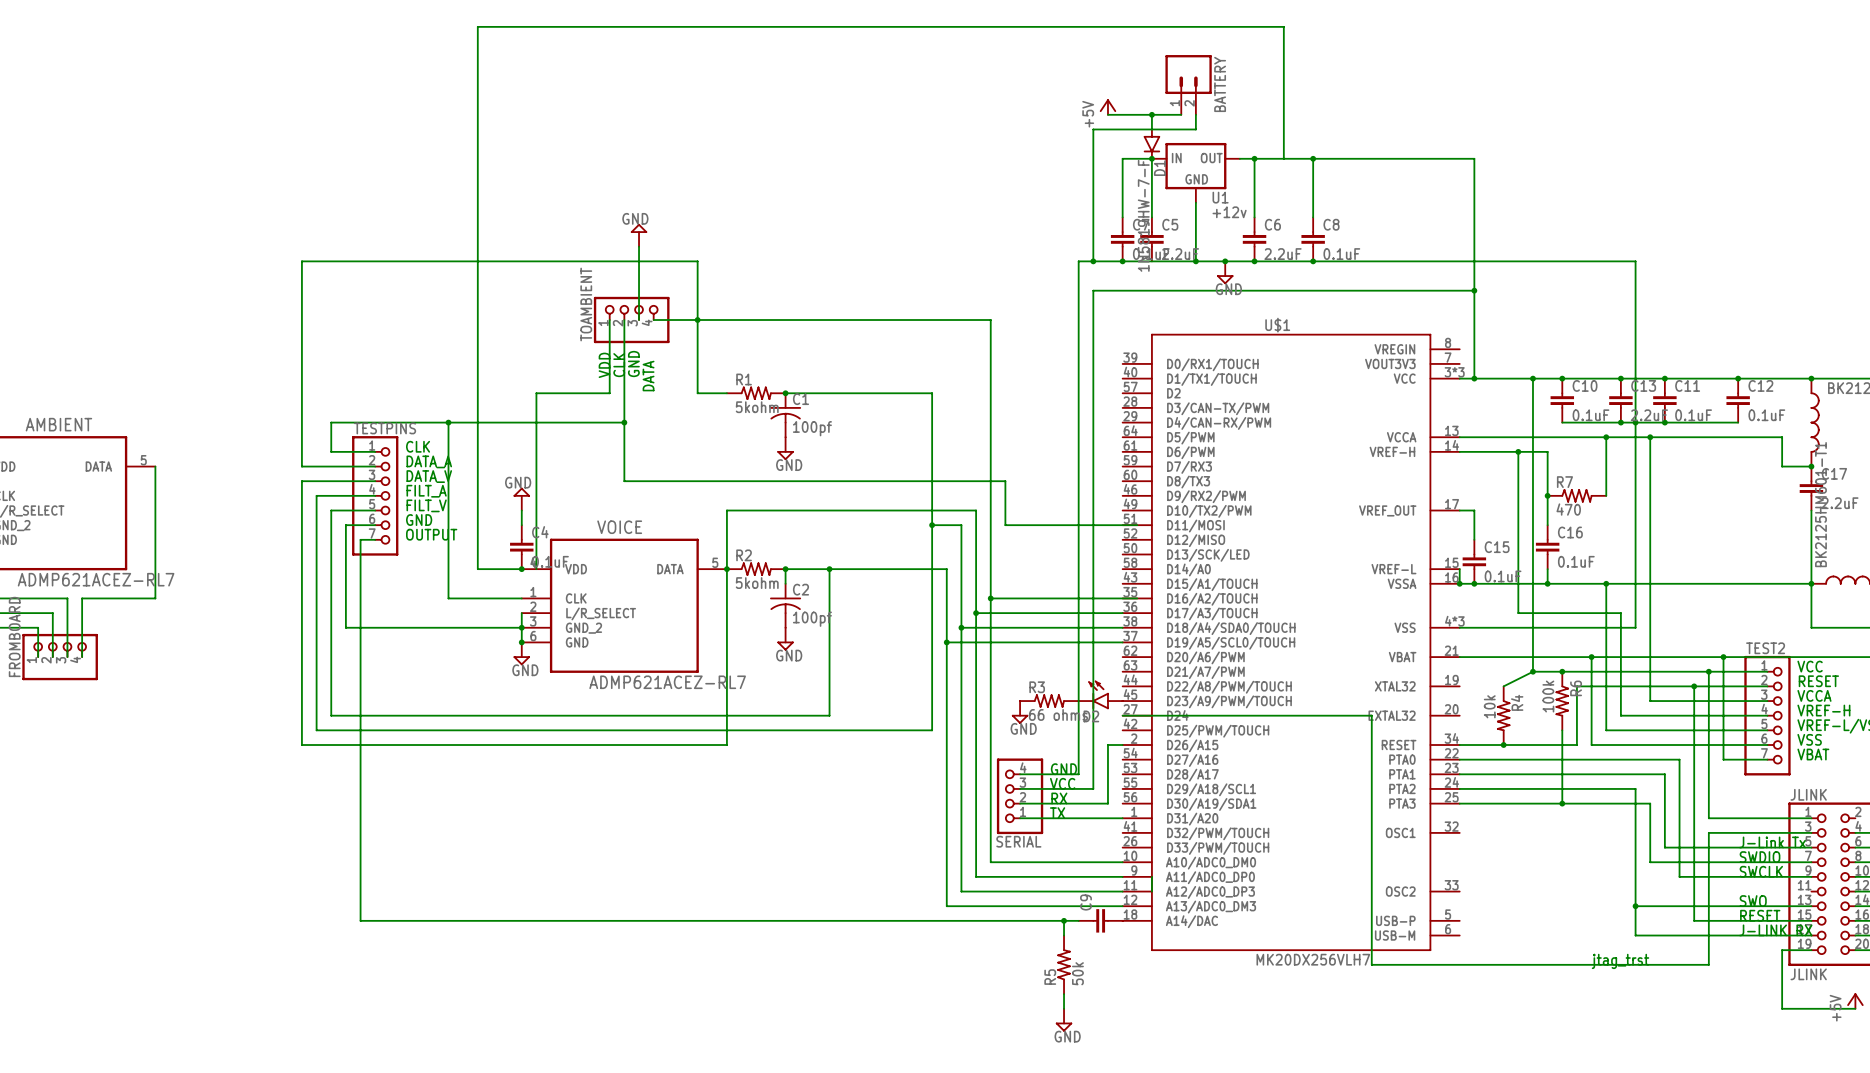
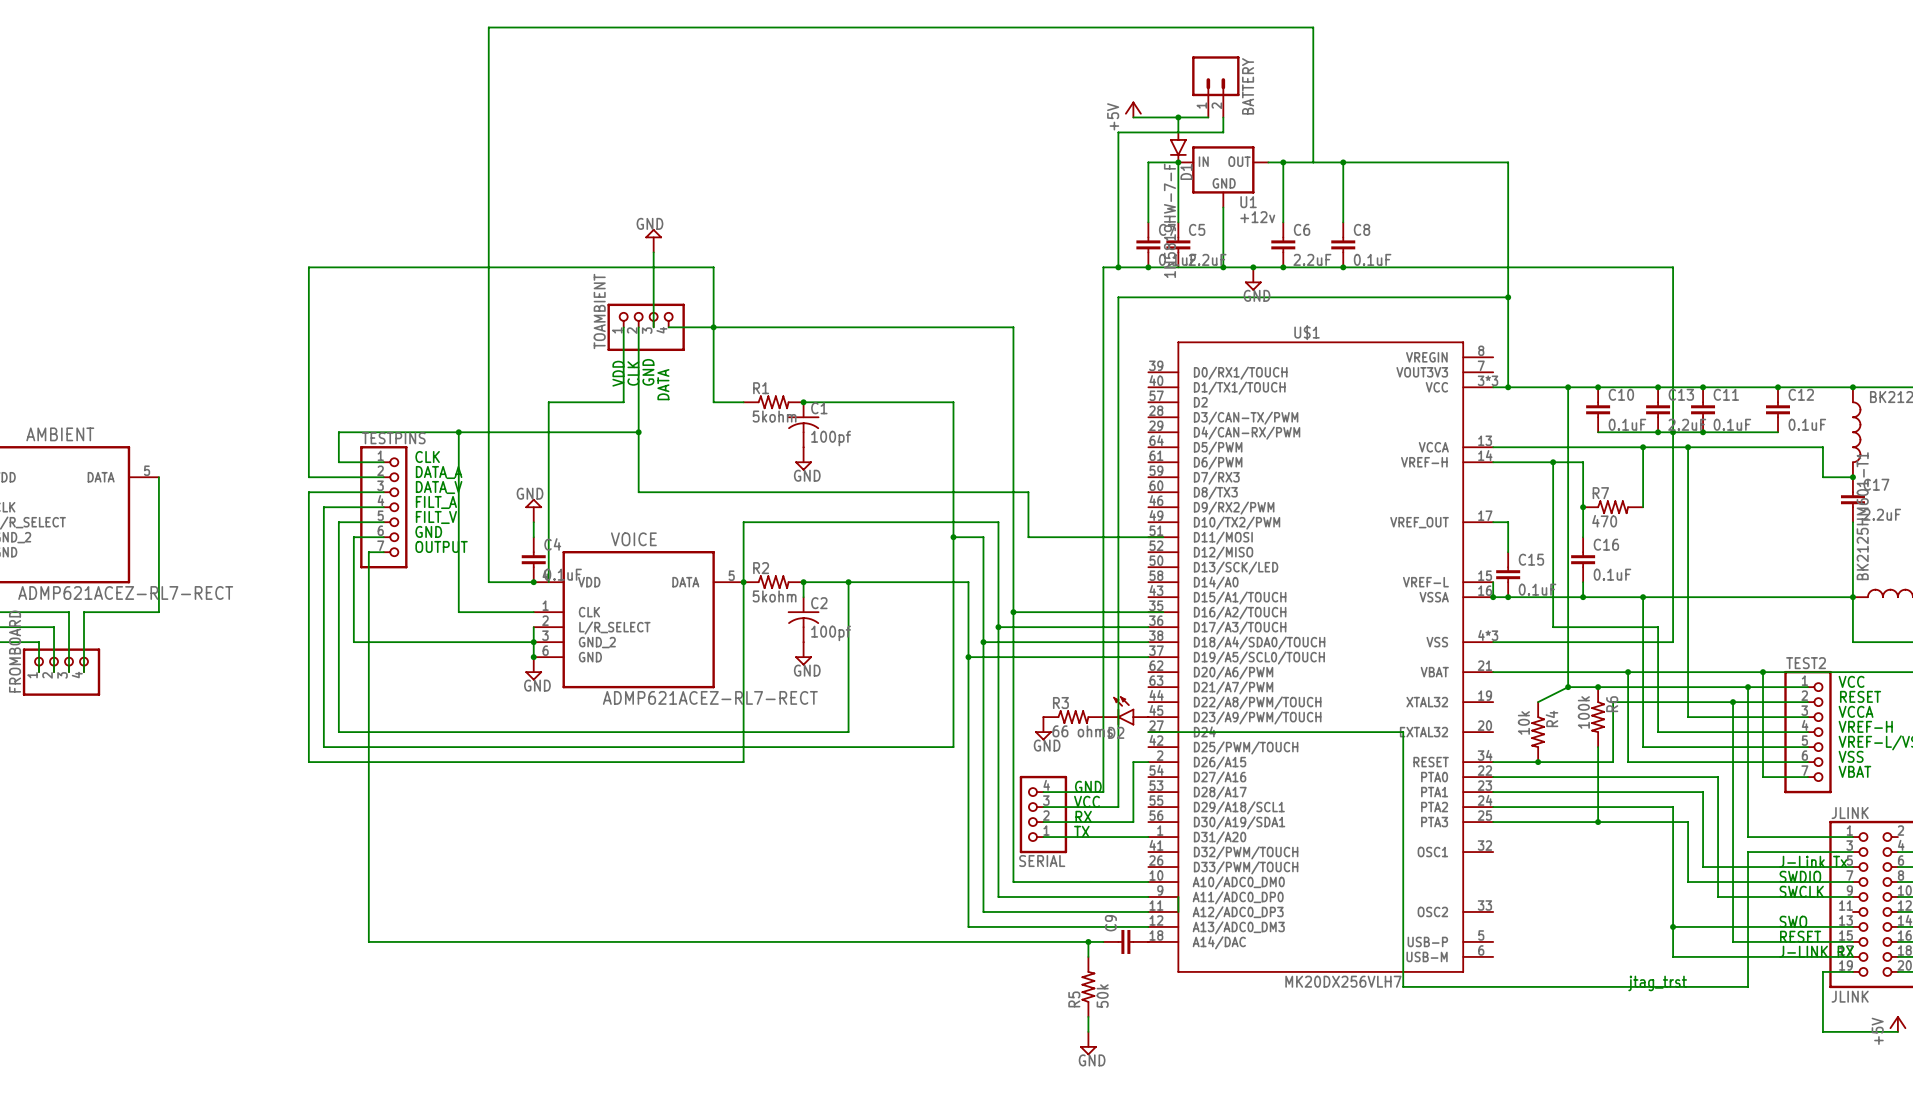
AMBIENT value: ADMP621ACEZ-RL7 (96, 579) -> ADMP621ACEZ-RL7-RECT (125, 592)
VOICE value: ADMP621ACEZ-RL7 (667, 682) -> ADMP621ACEZ-RL7-RECT (710, 697)

